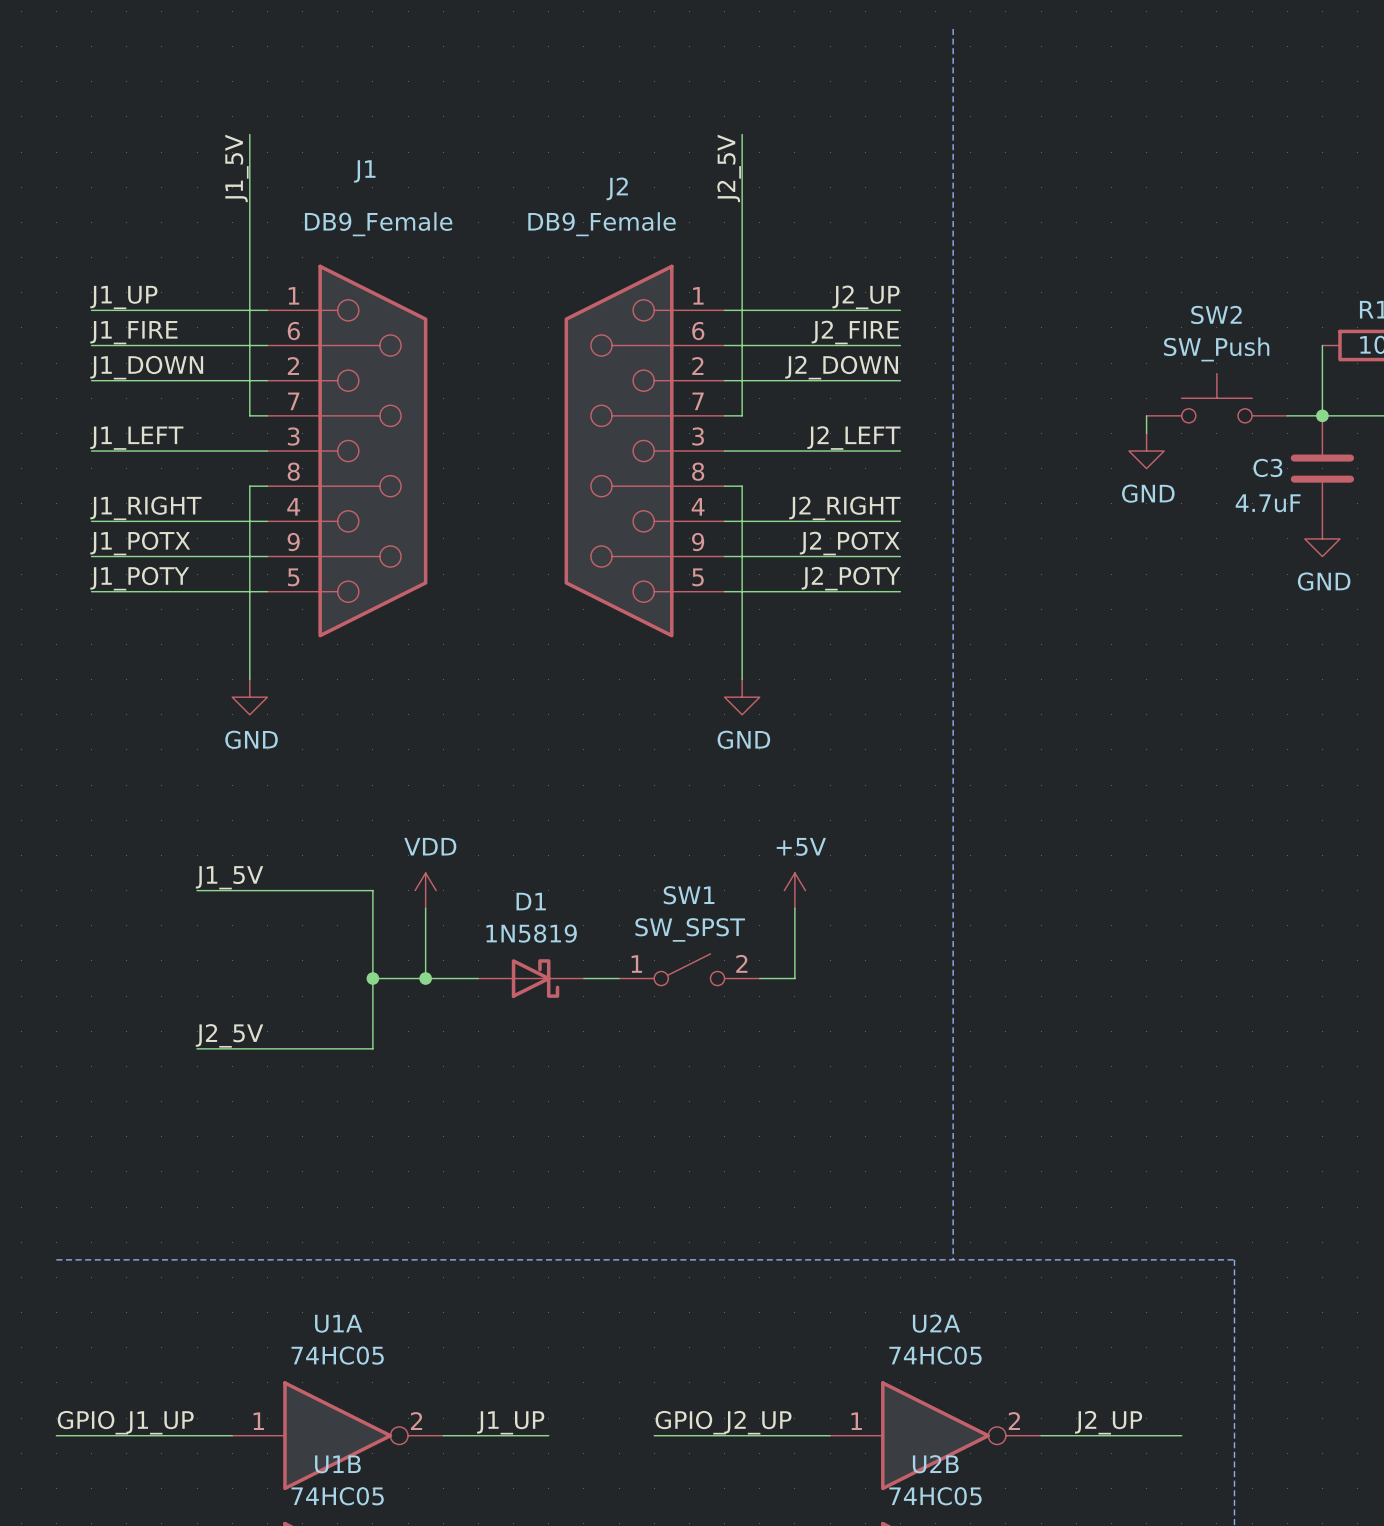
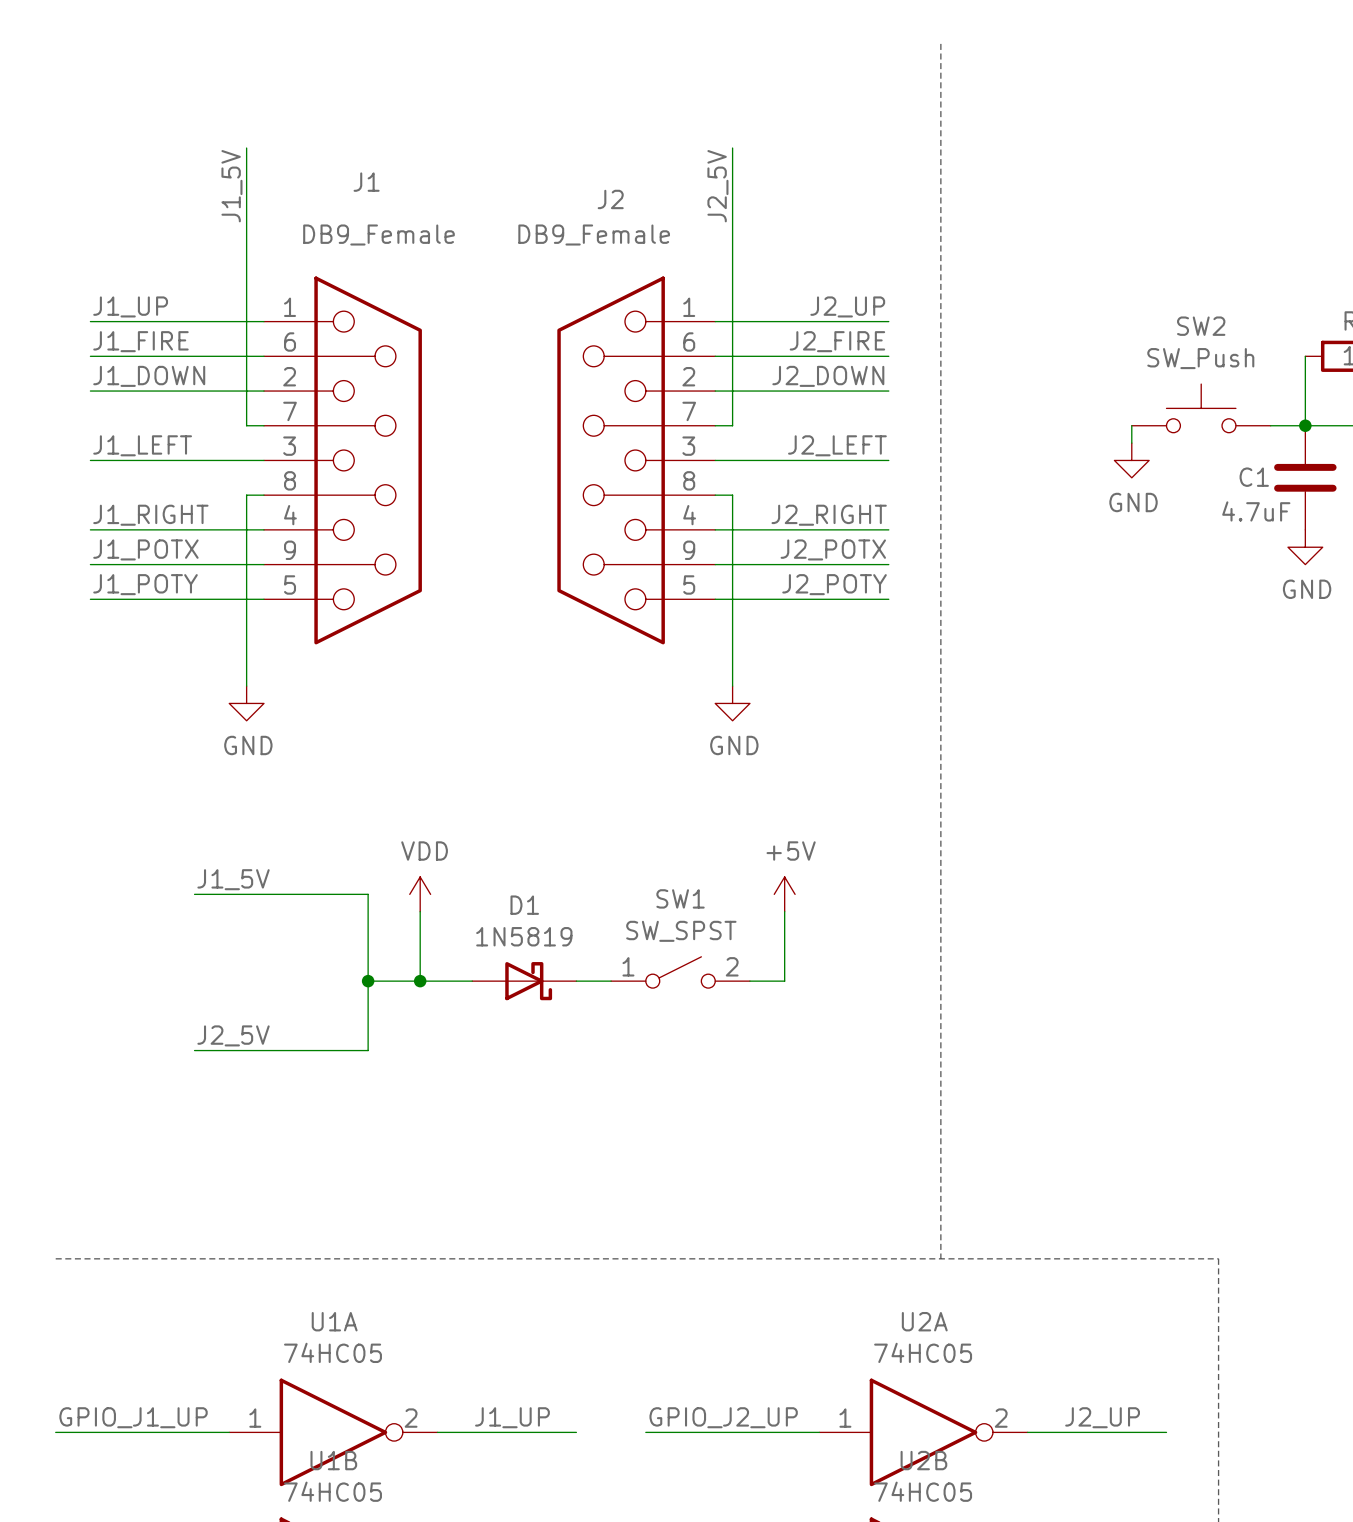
C3 name: C3 (1267, 467) -> C1 (1254, 477)
wire: none -> (541, 1432) (576, 1432)

